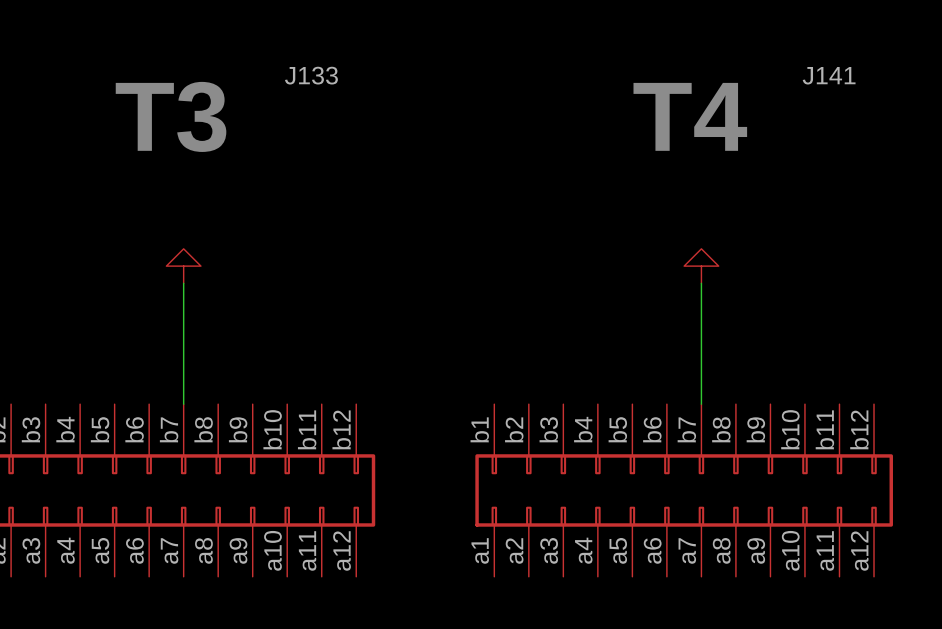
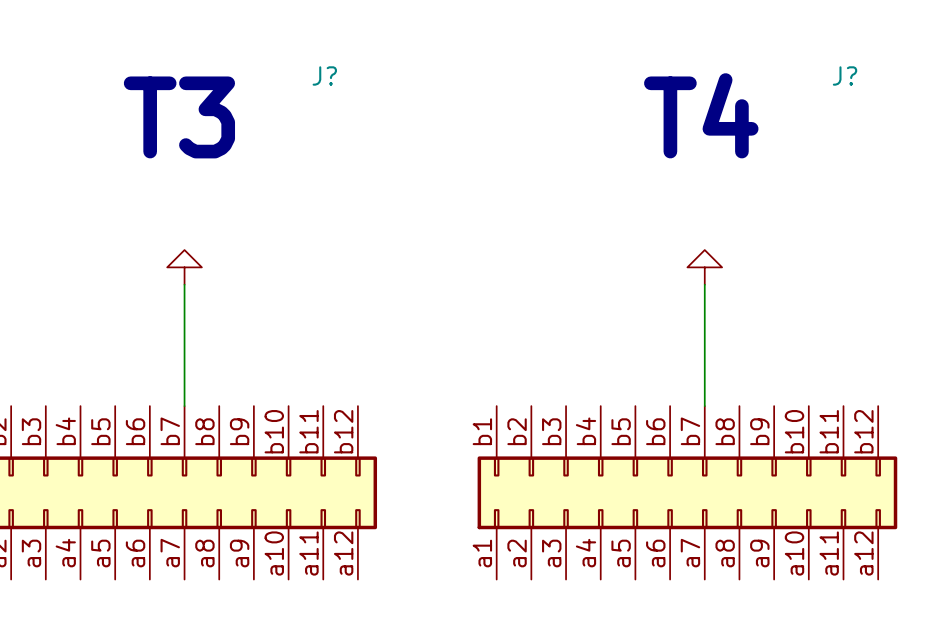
J133 name: J133 (311, 75) -> J? (324, 75)
J141 name: J141 (829, 75) -> J? (845, 75)

